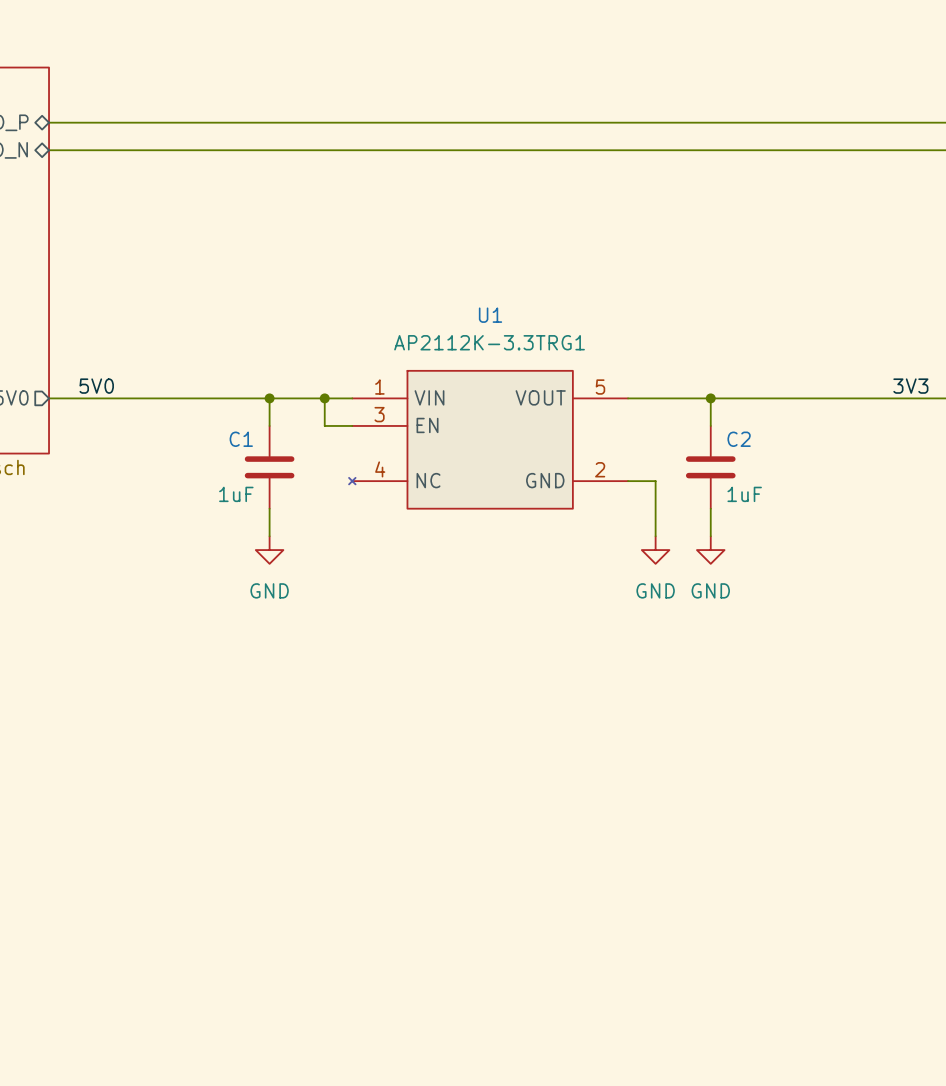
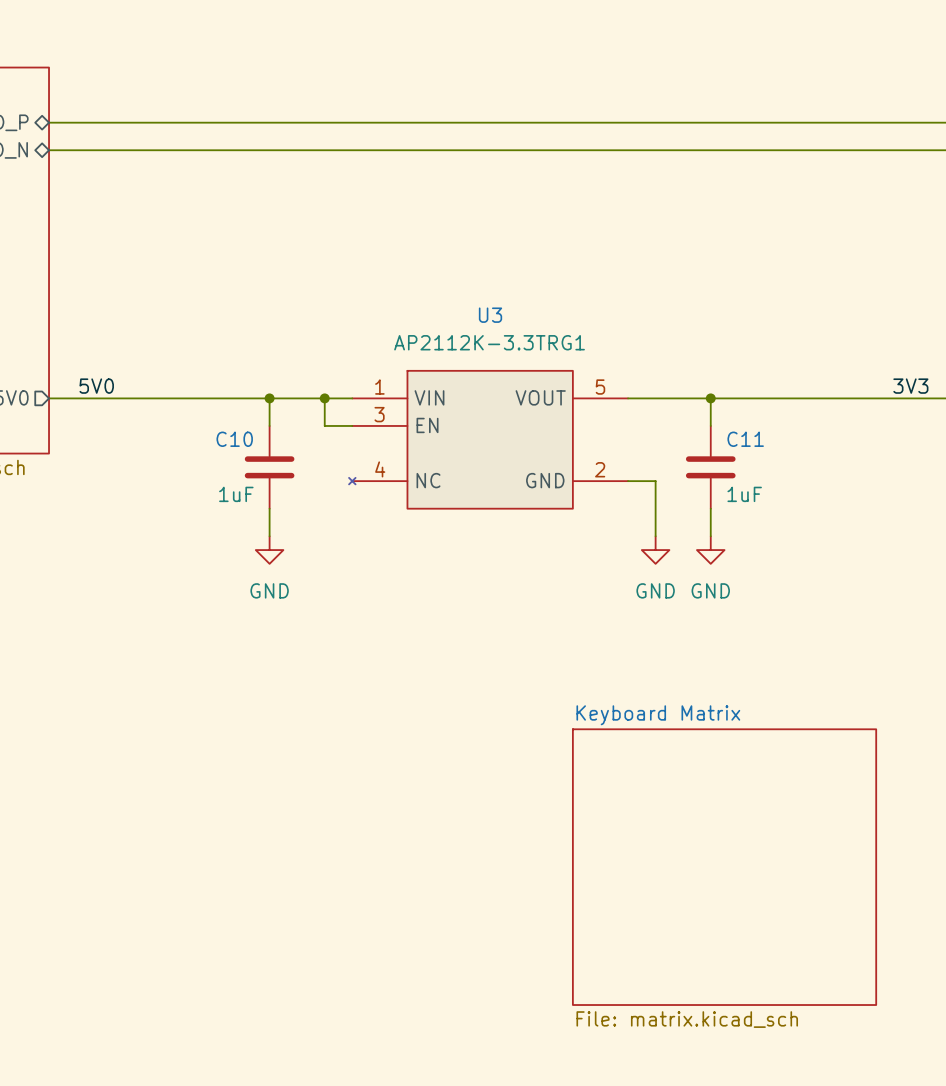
U1 name: U1 (490, 315) -> U3 (490, 315)
C1 name: C1 (241, 439) -> C10 (234, 439)
C2 name: C2 (739, 439) -> C11 (745, 439)
sheet Keyboard Matrix: none -> File: matrix.kicad_sch (724, 867)

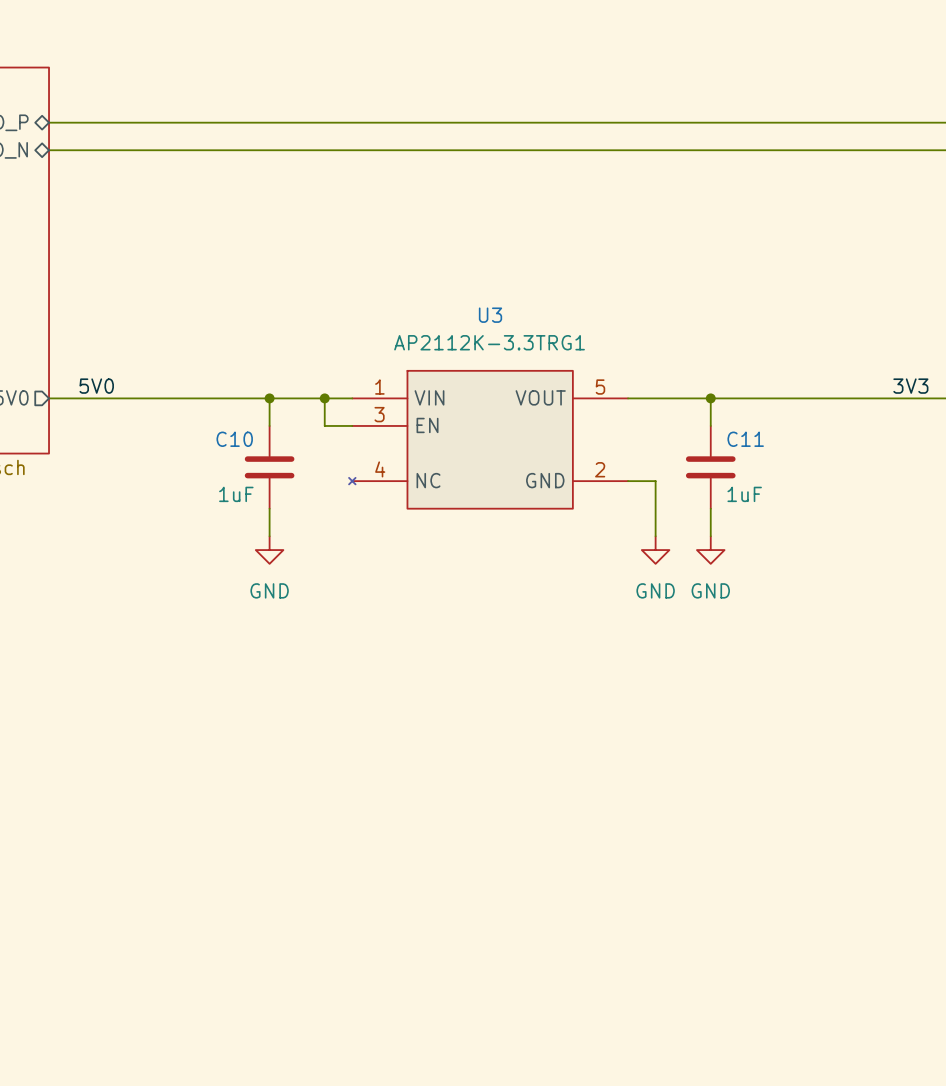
sheet Keyboard Matrix: File: matrix.kicad_sch (724, 867) -> none

